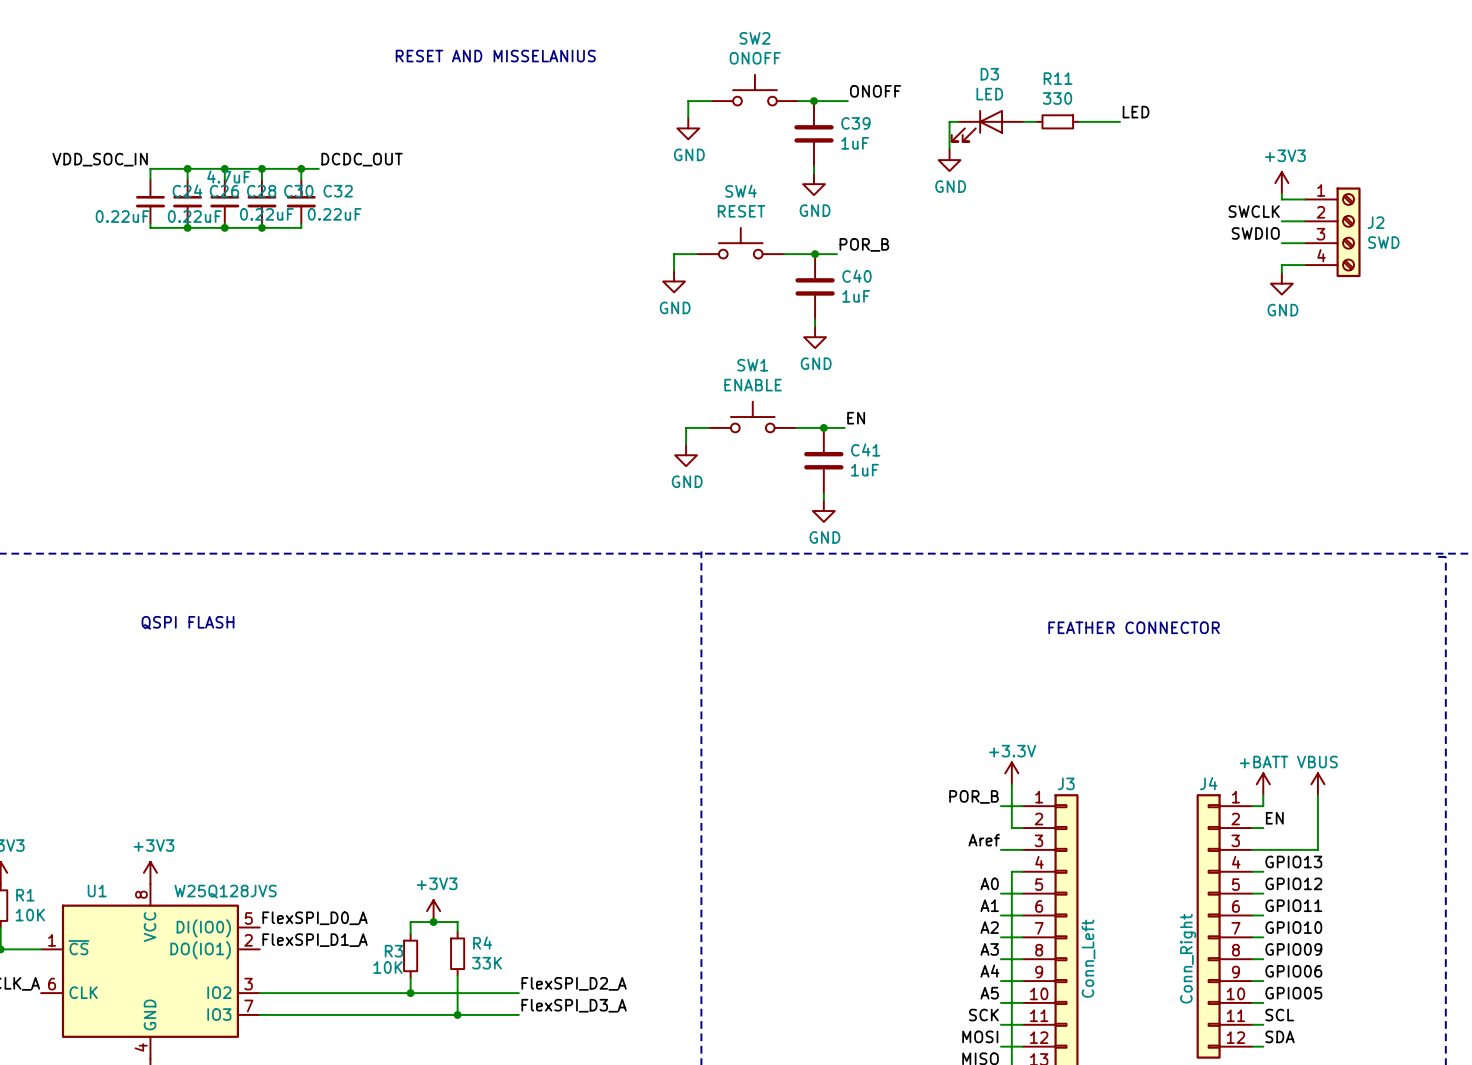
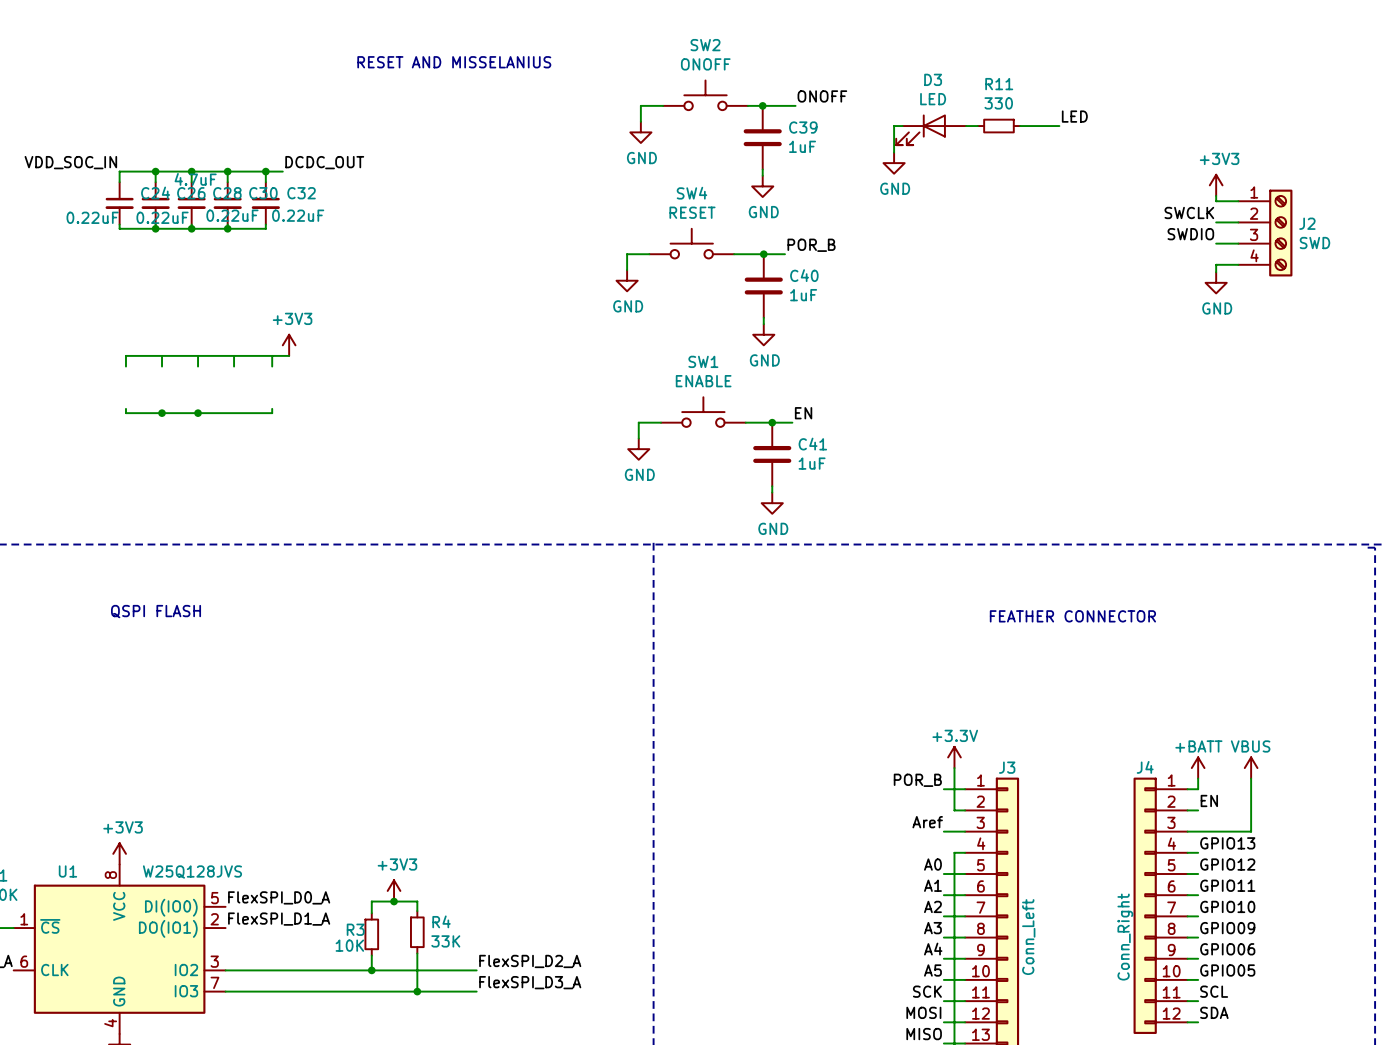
power symbol: none -> +3V3 (289, 345)
wire: none -> (162, 355) (162, 366)
wire: none -> (198, 355) (198, 366)
wire: none -> (234, 355) (234, 366)
wire: none -> (272, 355) (272, 366)
wire: none -> (289, 355) (125, 355) (125, 366)
wire: none -> (125, 408) (125, 413) (272, 413) (272, 408)
junction: none -> (162, 413)
junction: none -> (198, 413)

